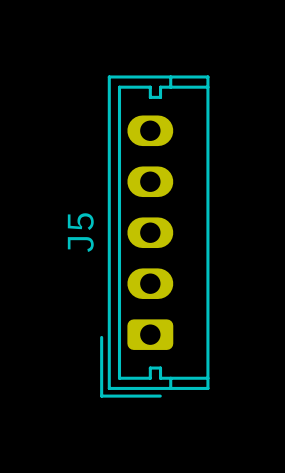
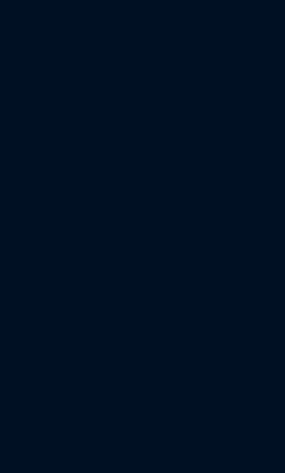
J5: (154, 236) -> none

